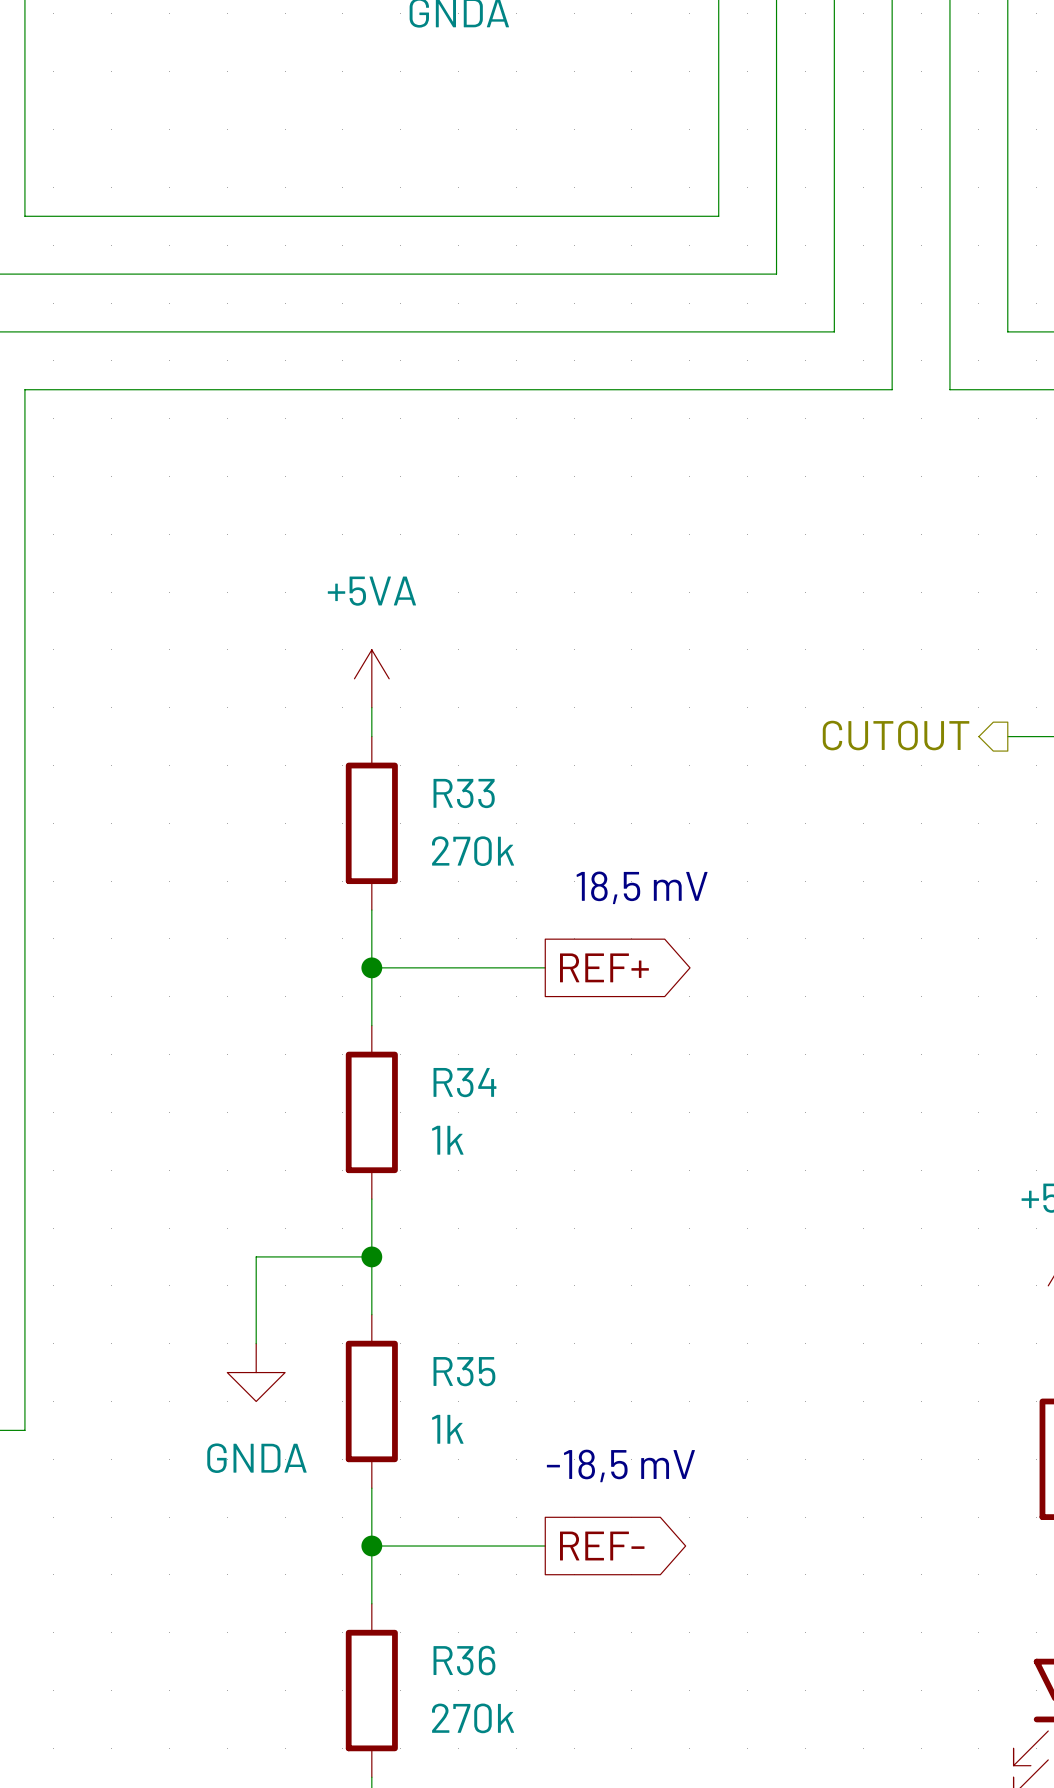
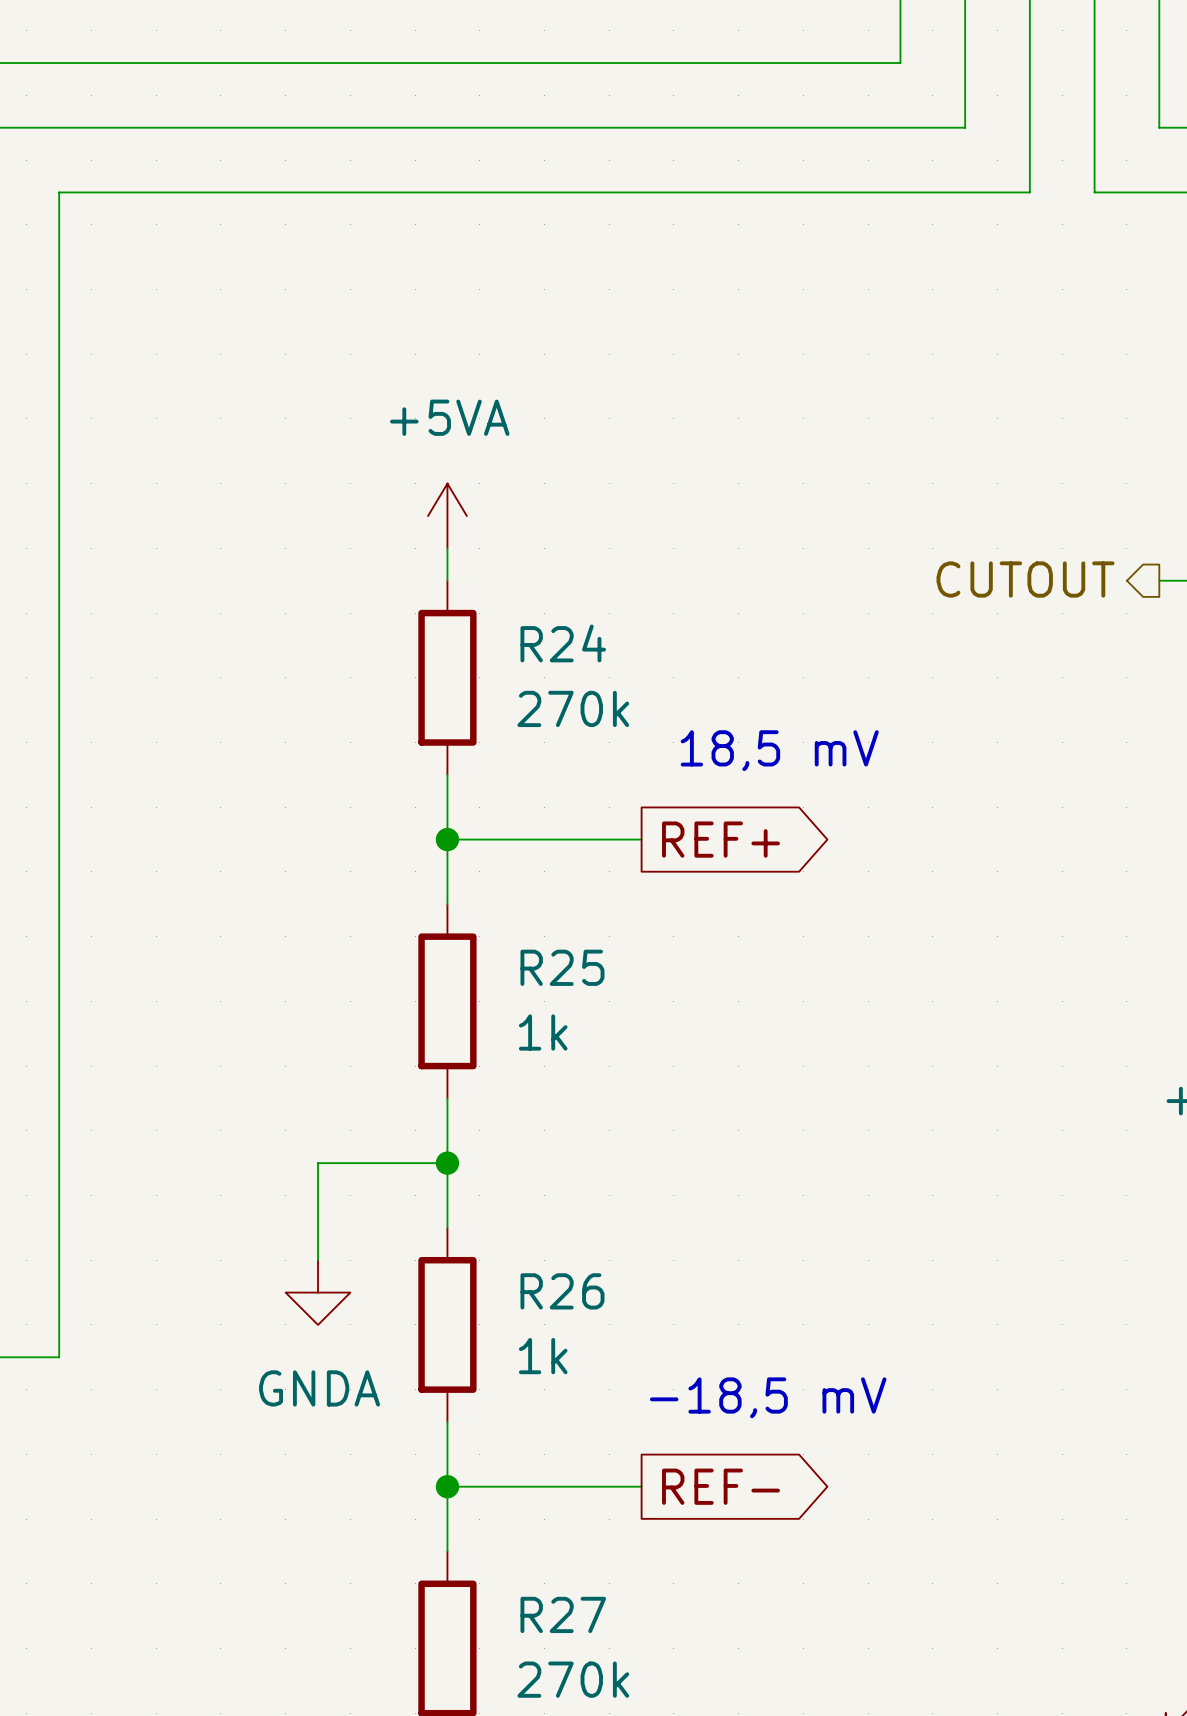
R33 name: R33 (464, 793) -> R24 (563, 643)
R34 name: R34 (464, 1082) -> R25 (562, 967)
R35 name: R35 (464, 1371) -> R26 (562, 1291)
R36 name: R36 (464, 1660) -> R27 (563, 1614)

